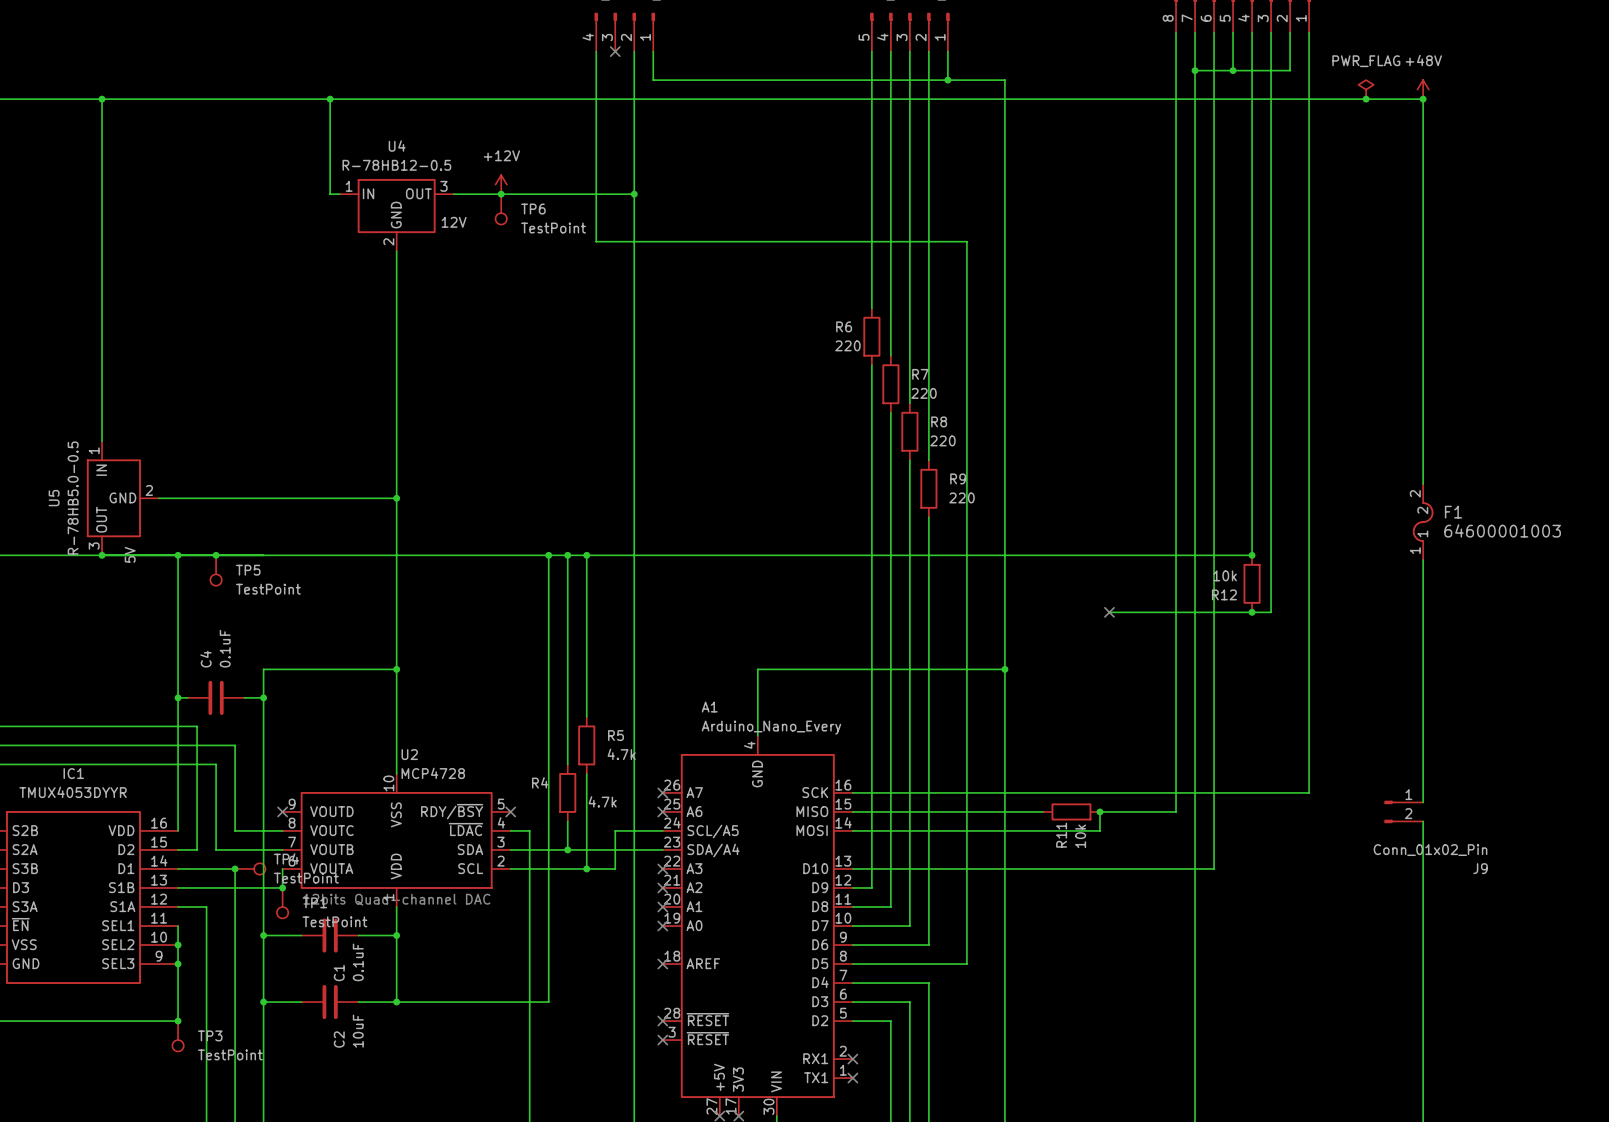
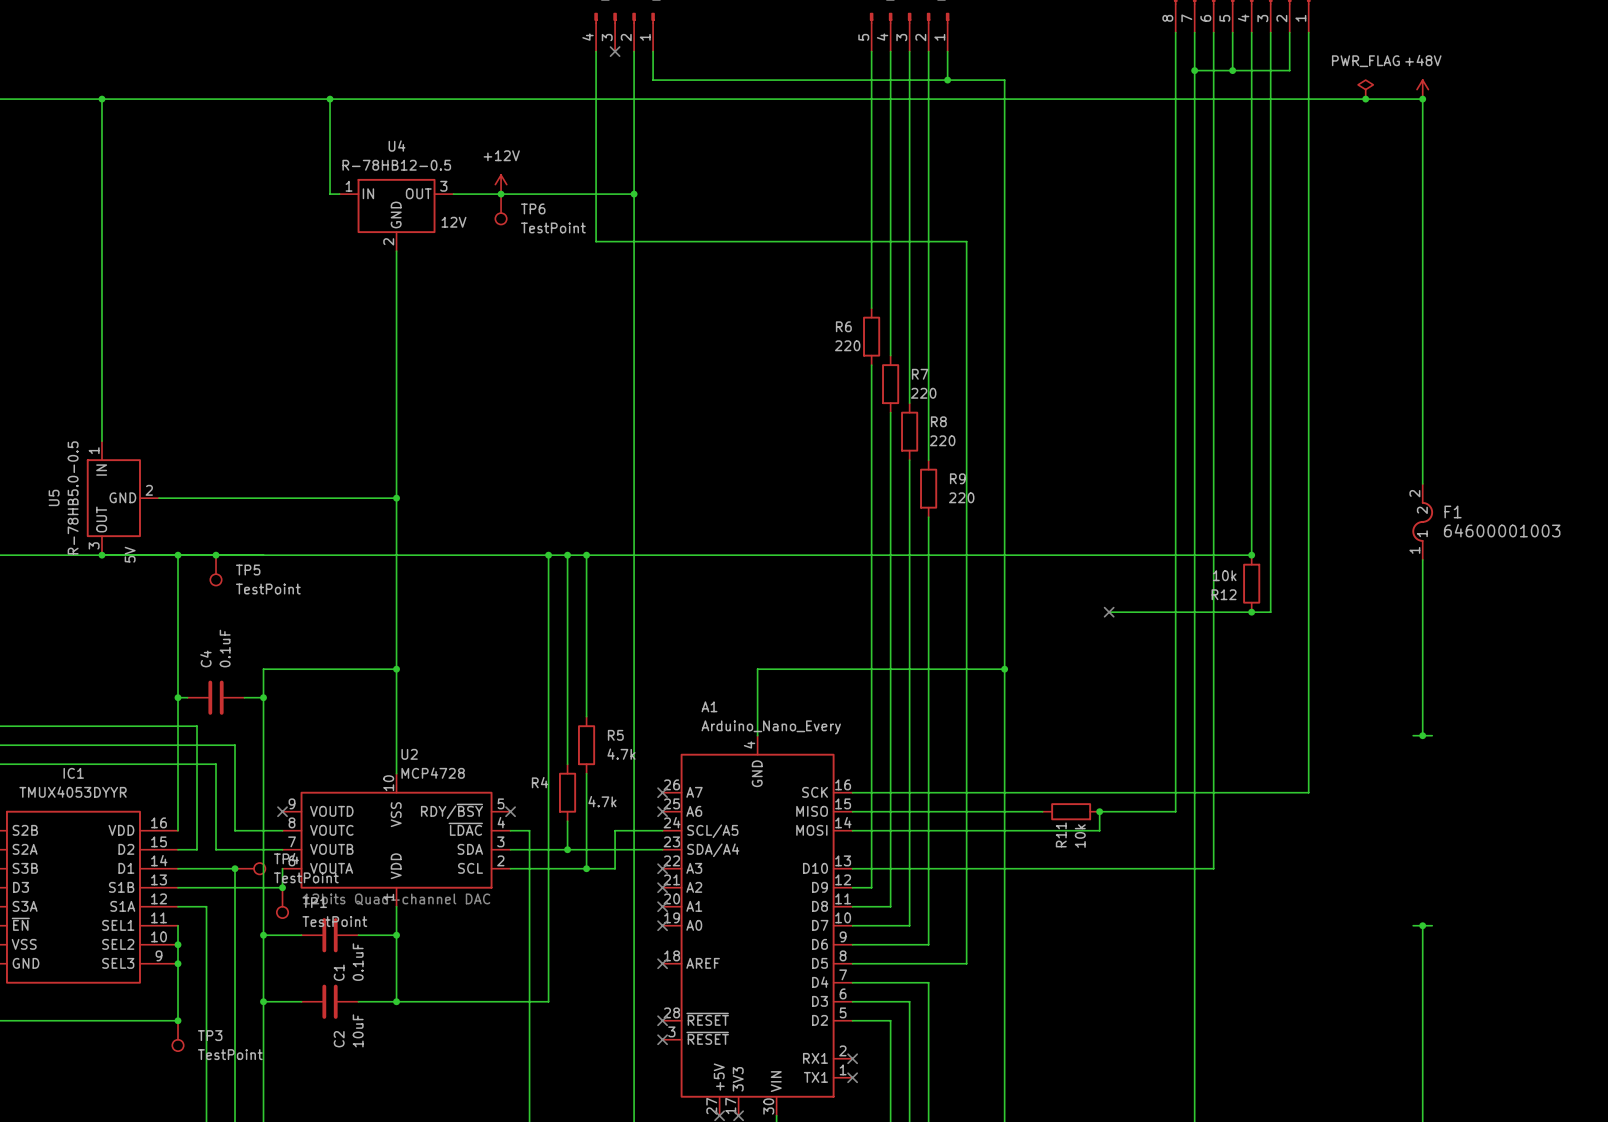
wire: none -> (1413, 735) (1432, 735)
wire: (1423, 735) (1423, 802) -> none
junction: none -> (1422, 735)
J9: Conn_01x02_Pin (1403, 811) -> none
wire: (1423, 821) (1423, 926) -> none
wire: none -> (1413, 925) (1432, 925)
junction: none -> (1422, 925)

